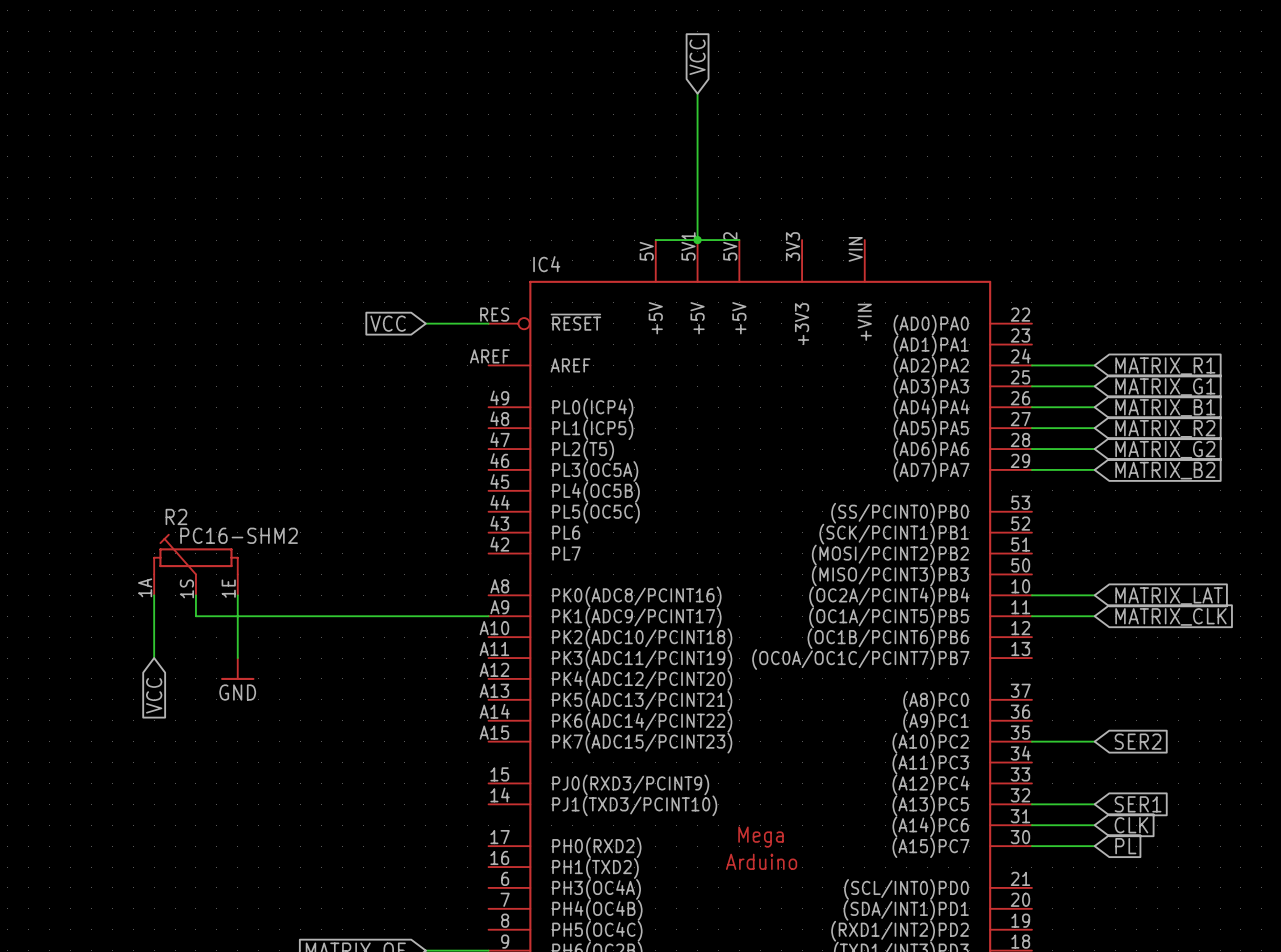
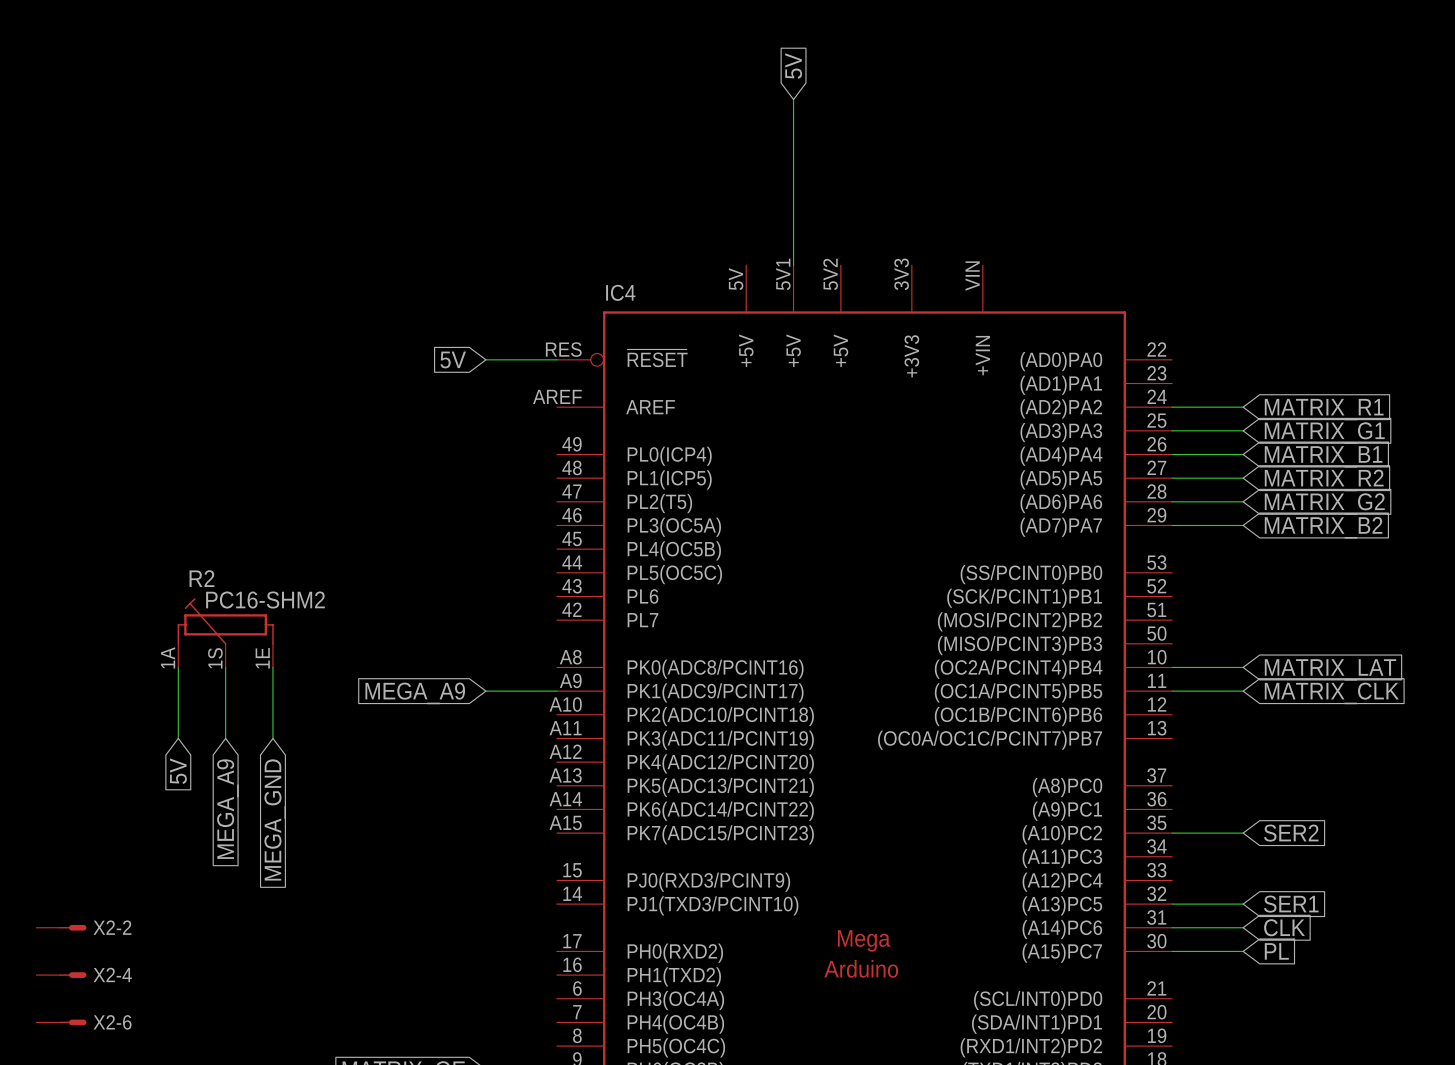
global label: VCC (697, 57) -> 5V (793, 66)
wire: (655, 240) (739, 240) -> none
junction: (697, 240) -> none
global label: VCC (388, 323) -> 5V (453, 359)
wire: (195, 616) (425, 616) -> (225, 691) (225, 738)
global label: none -> MEGA_A9 (415, 693)
power symbol: GND (237, 669) -> none
global label: VCC (154, 695) -> 5V (178, 771)
global label: none -> MEGA_A9 (227, 809)
global label: none -> MEGA_GND (275, 819)
X2-2: none -> (61, 927)
X2-4: none -> (61, 975)
X2-6: none -> (61, 1022)

